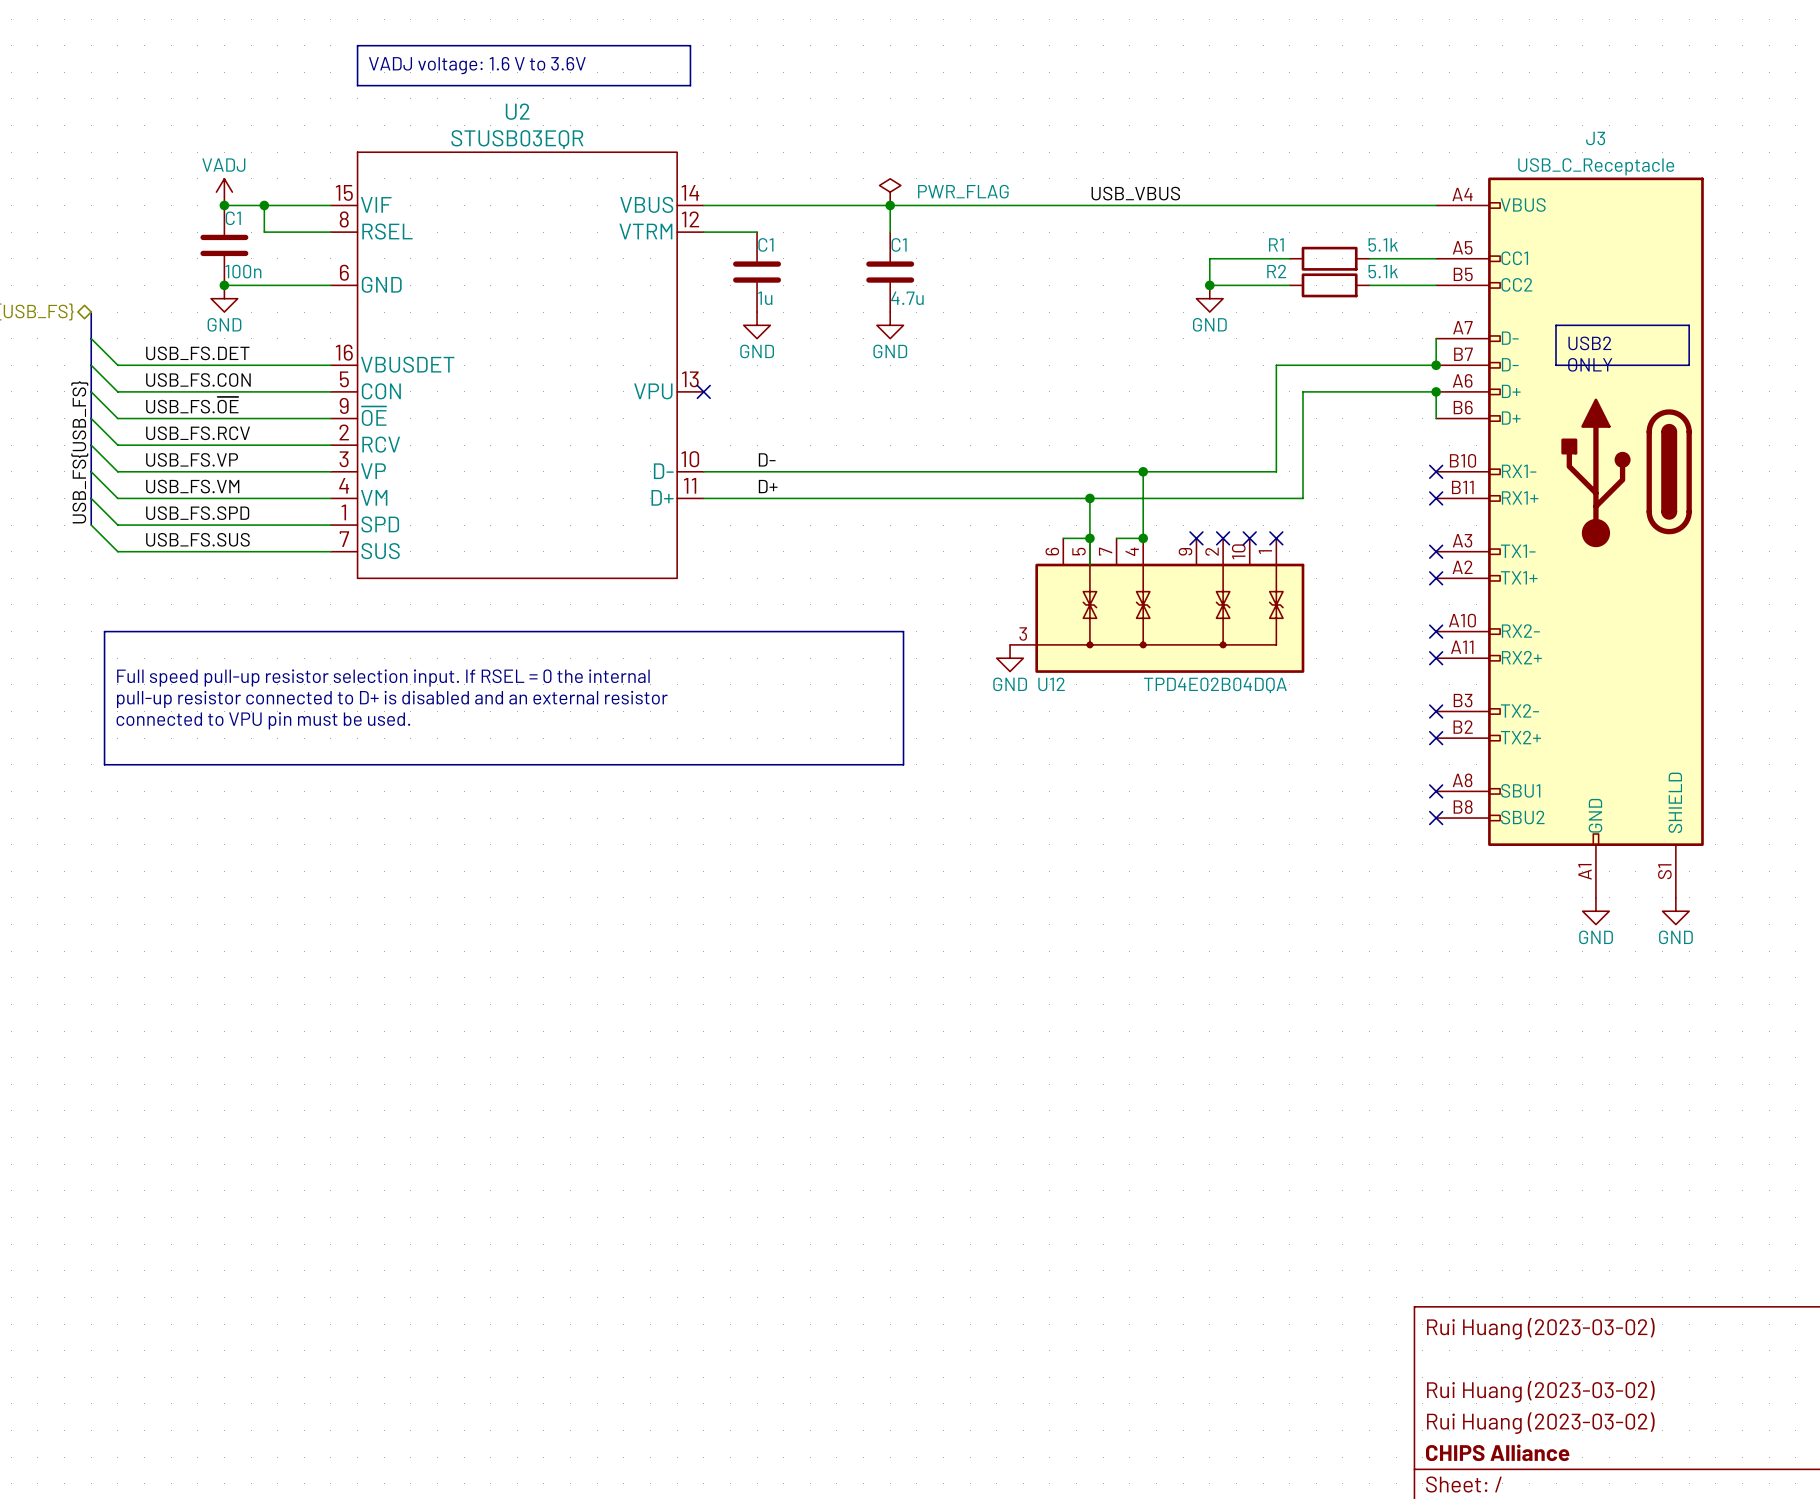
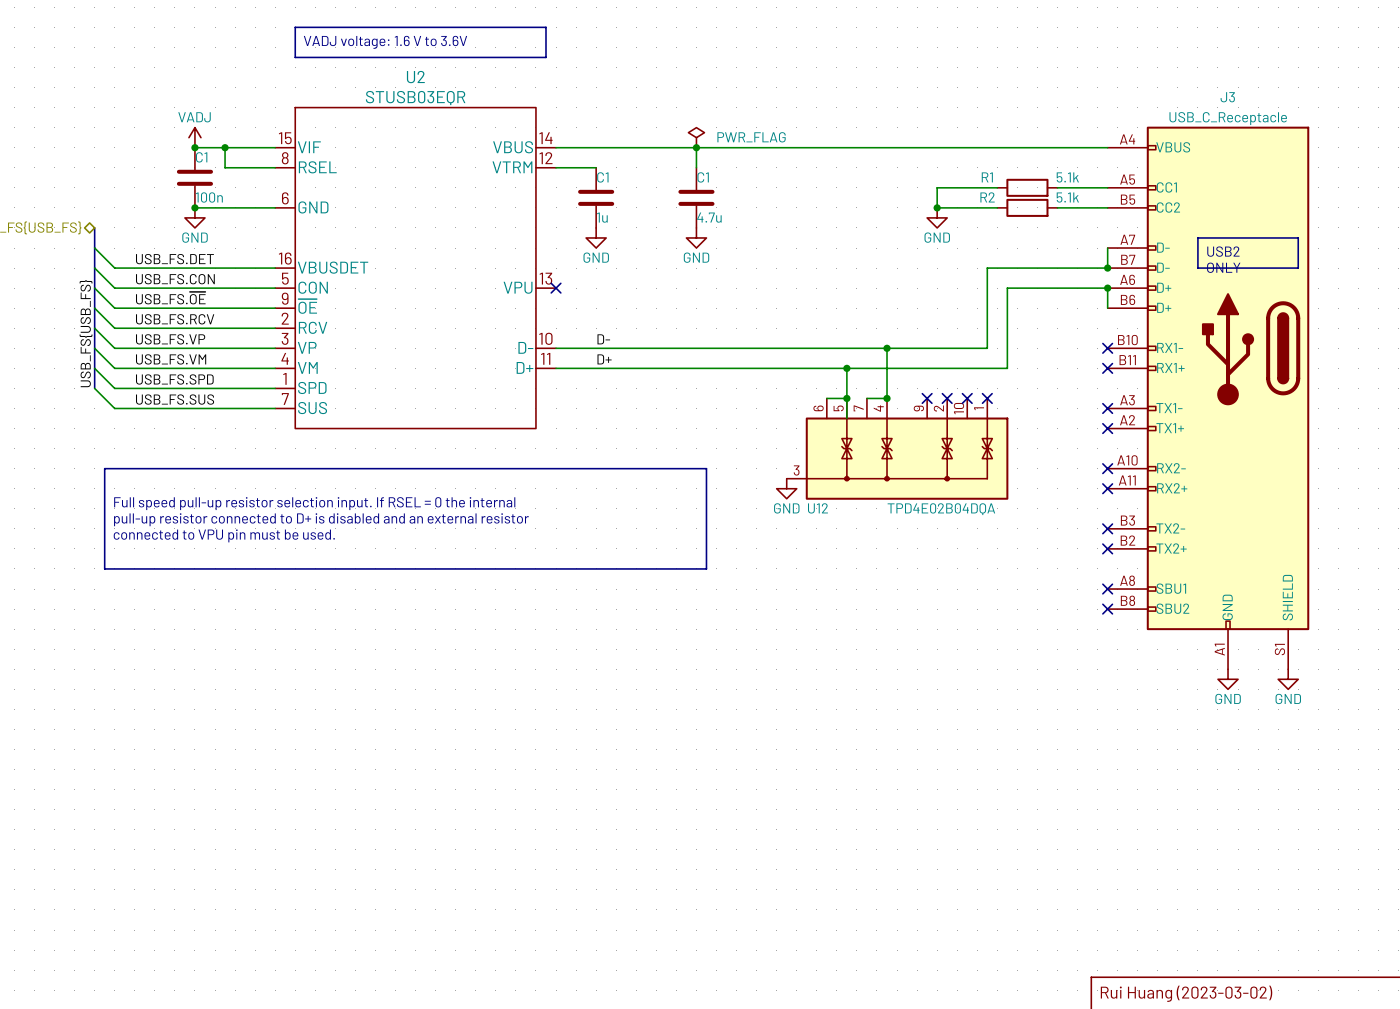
label: USB_VBUS (1135, 193) -> none

